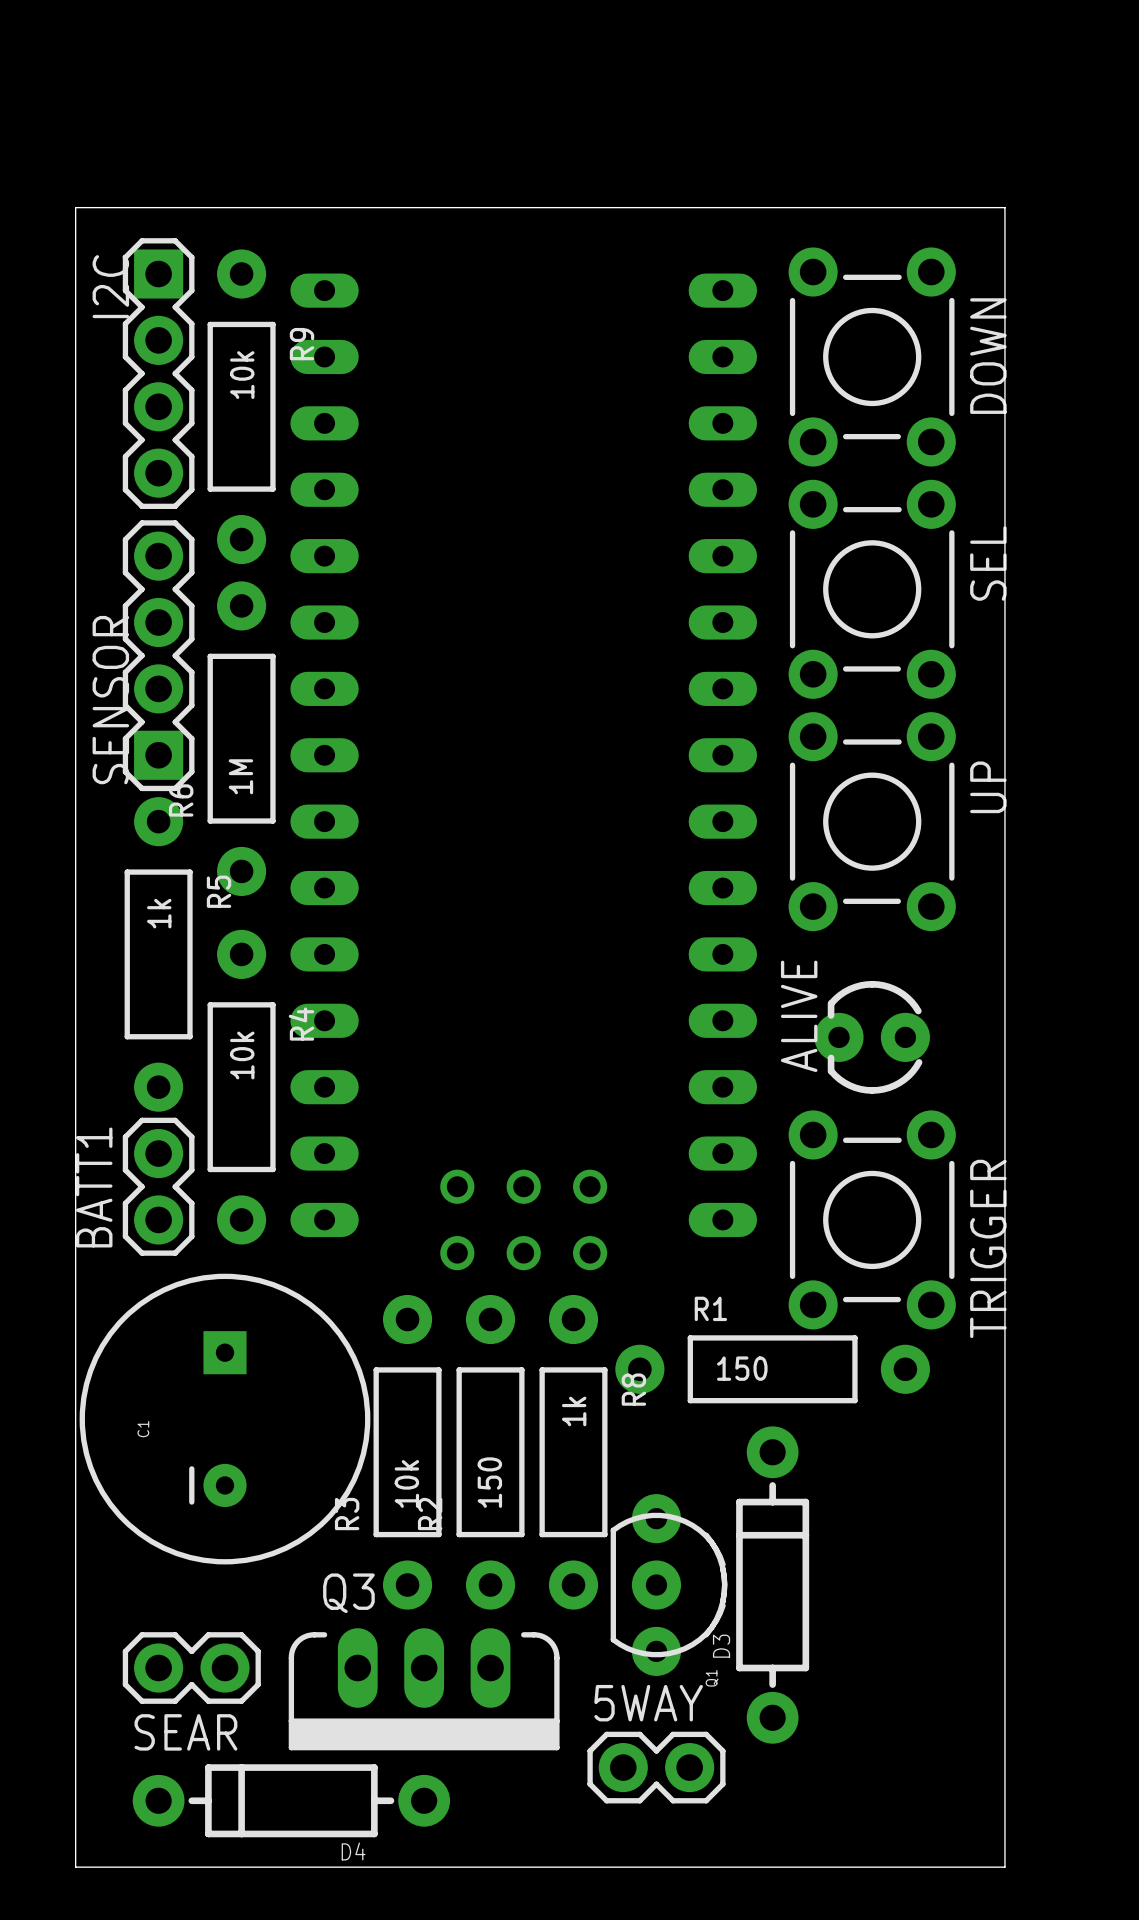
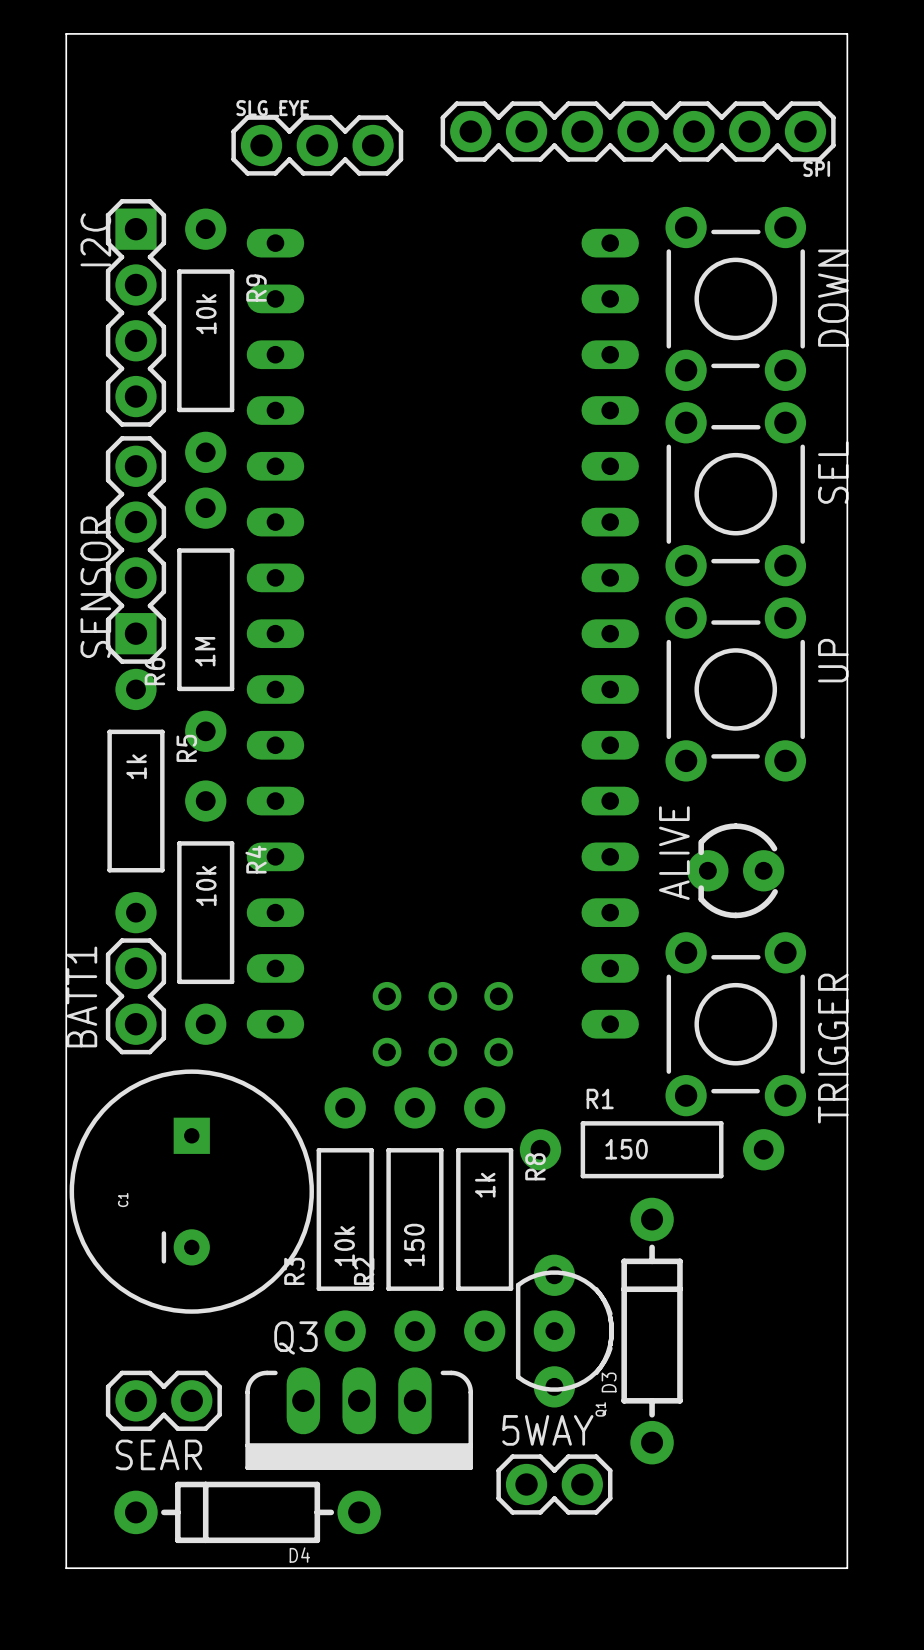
SPI: none -> (638, 131)
SLG_EYE: none -> (317, 145)
board edge: (75, 207) (1004, 207) -> (66, 173) (66, 33) (847, 33) (847, 173)

